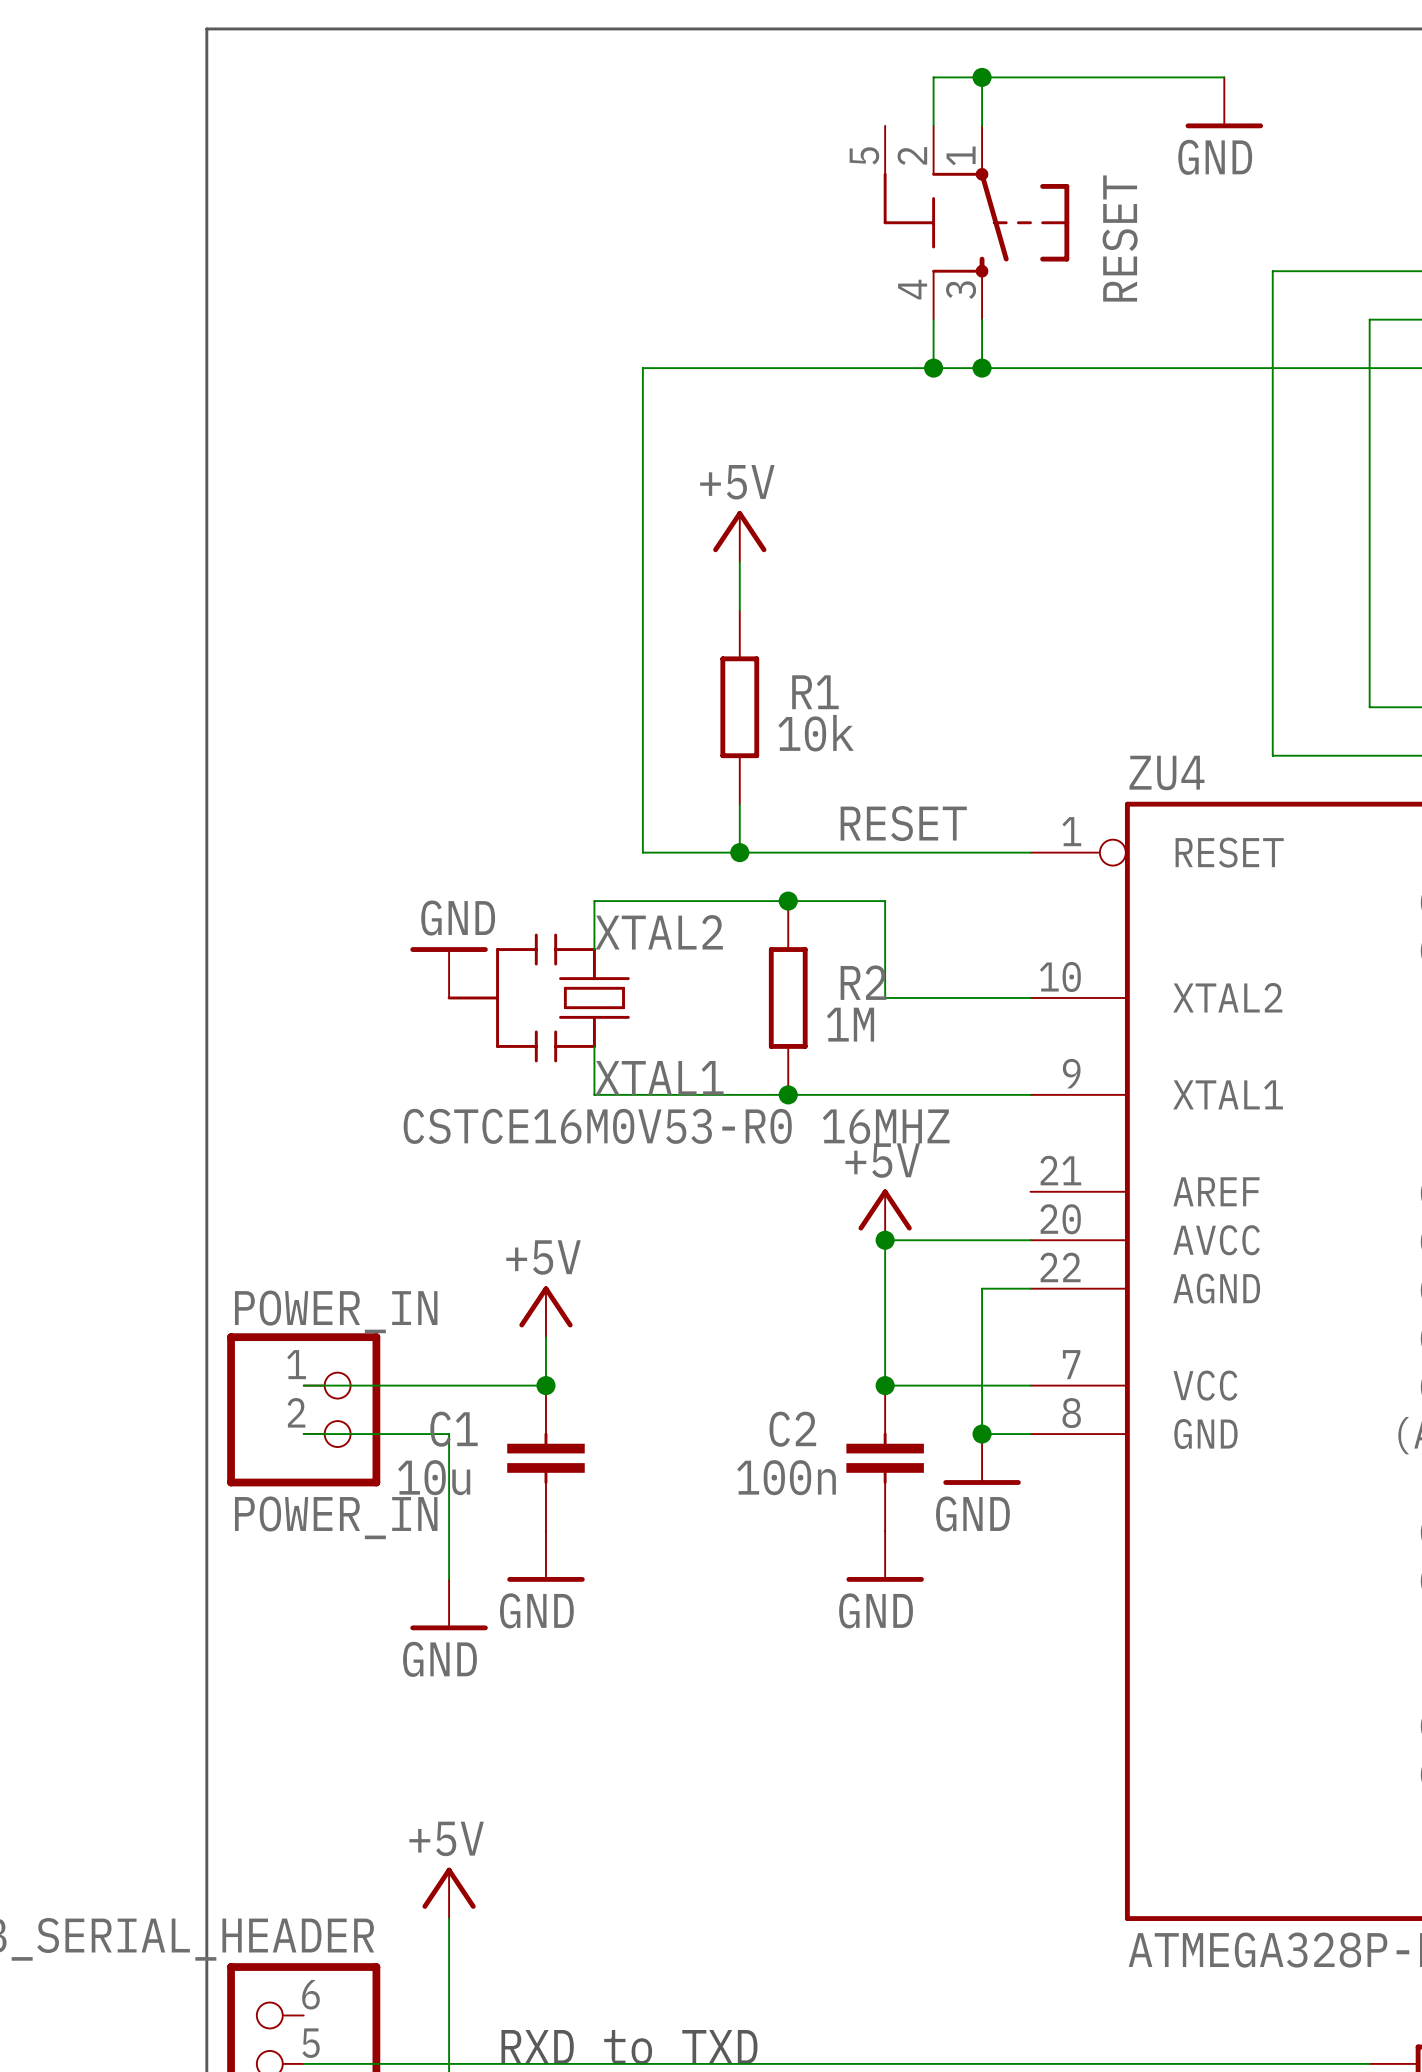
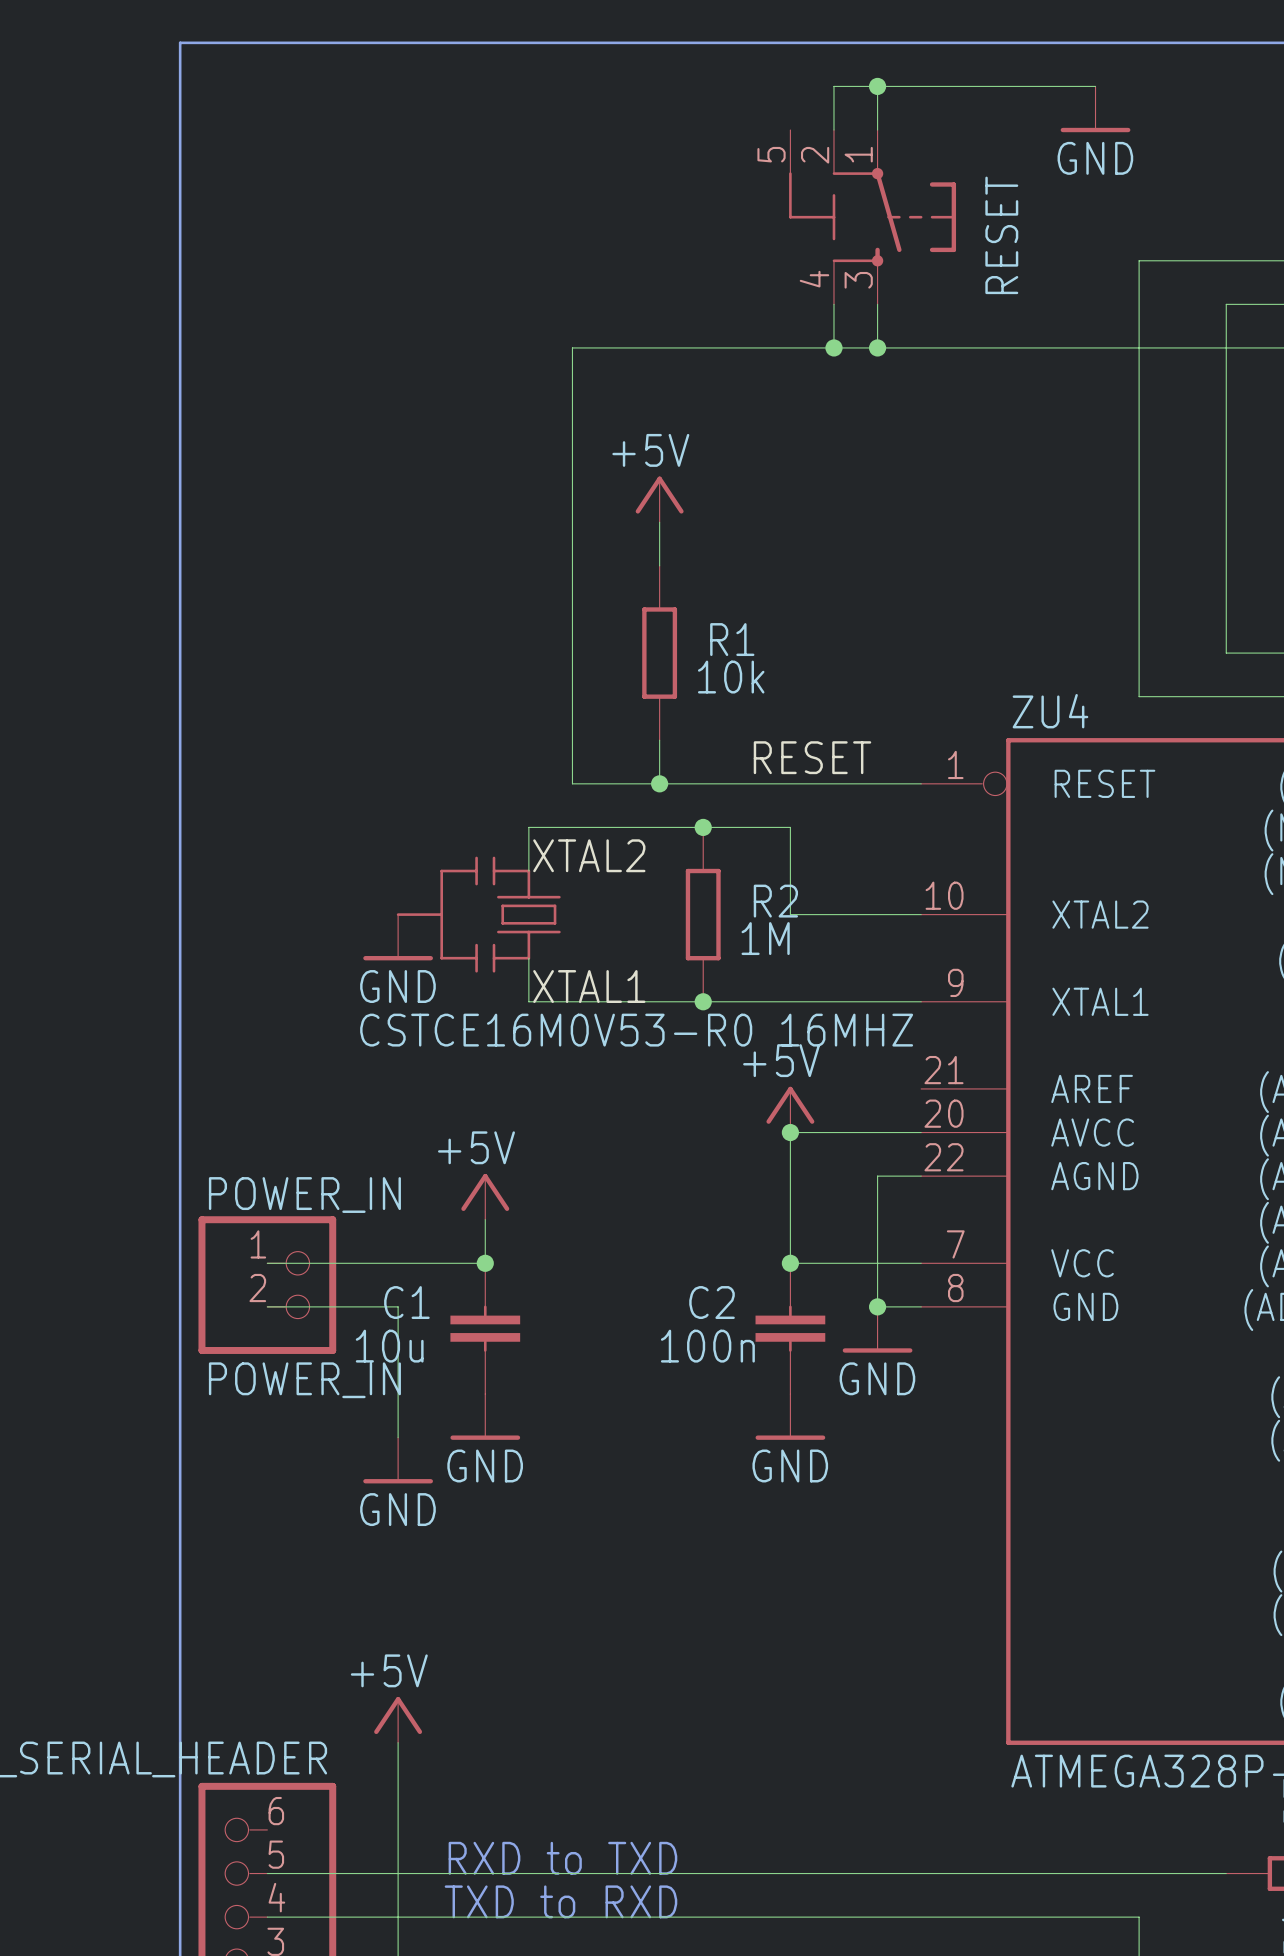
power symbol rotation: 0° (449, 949) -> 180° (398, 958)
power symbol position: GND (449, 972) -> GND (398, 937)

